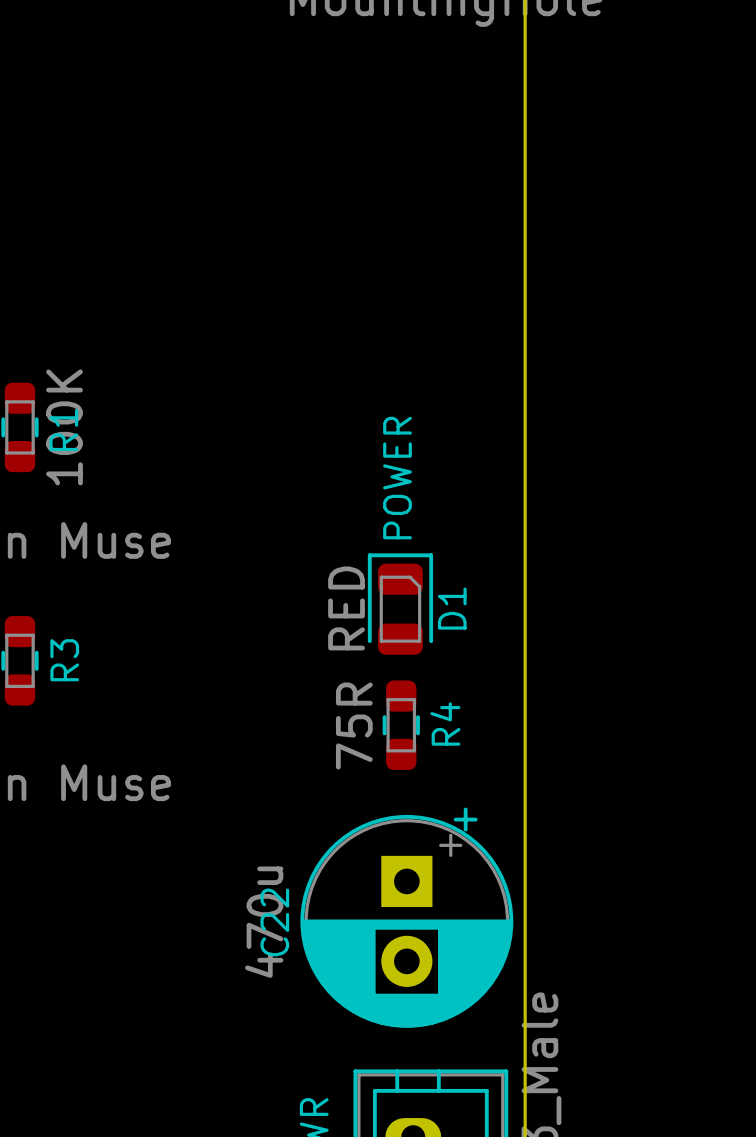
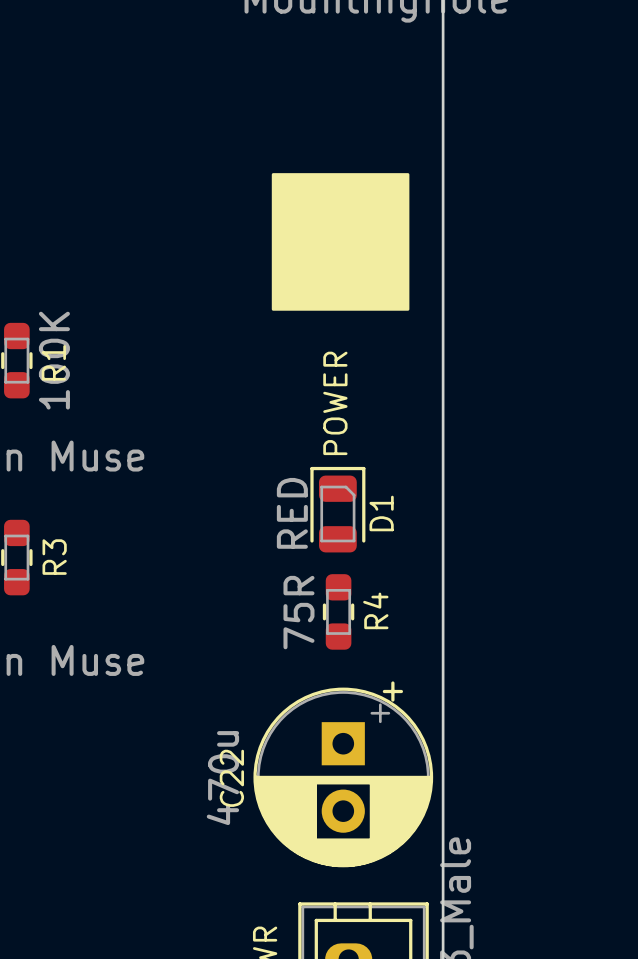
drawing: none -> [271, 173, 410, 311]

